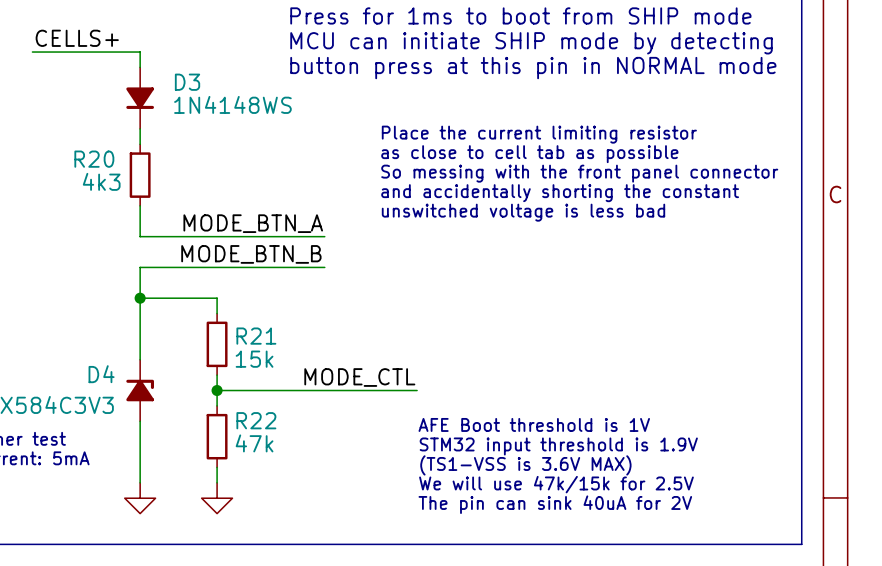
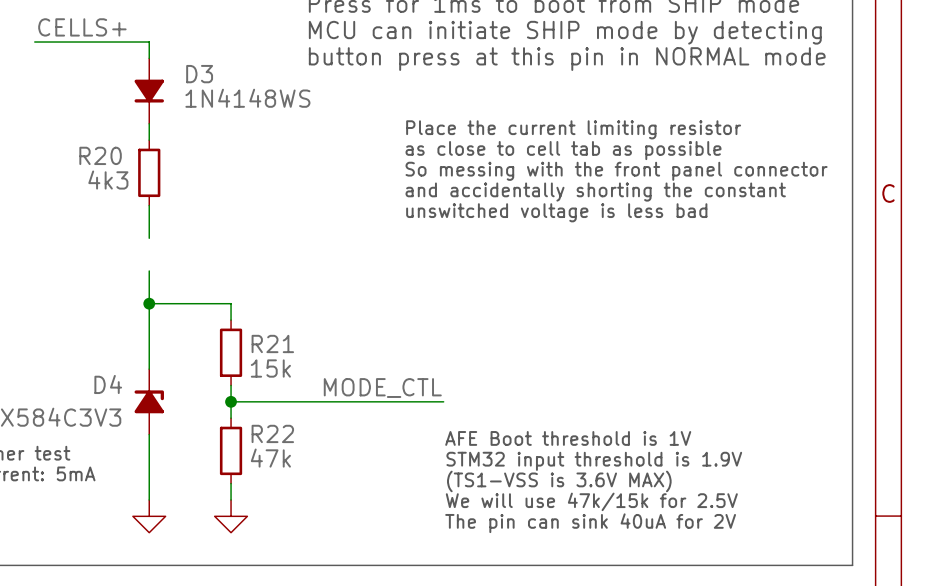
label: MODE_BTN_A (253, 223) -> none
wire: (140, 236) (324, 236) -> none
label: MODE_BTN_B (251, 254) -> none
wire: (140, 267) (324, 267) -> none

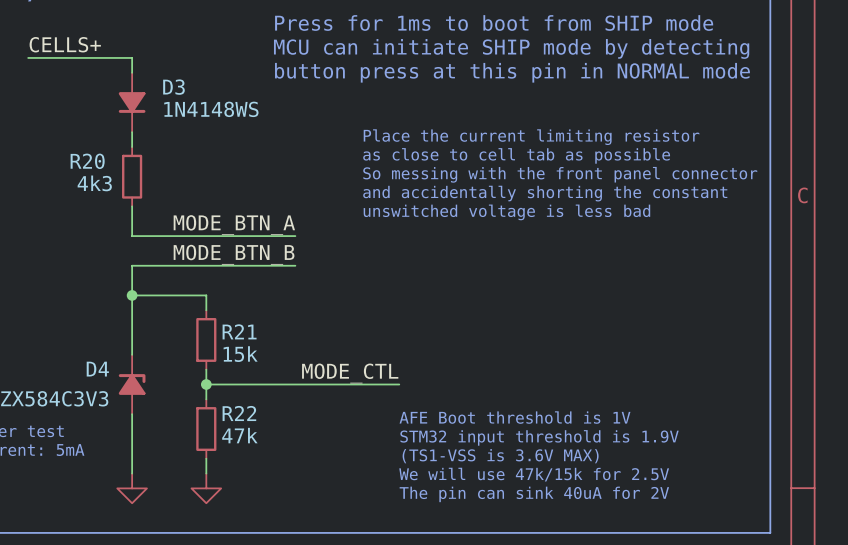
label: none -> MODE_BTN_A (234, 225)
wire: none -> (132, 236) (295, 236)
label: none -> MODE_BTN_B (234, 254)
wire: none -> (132, 265) (295, 265)

